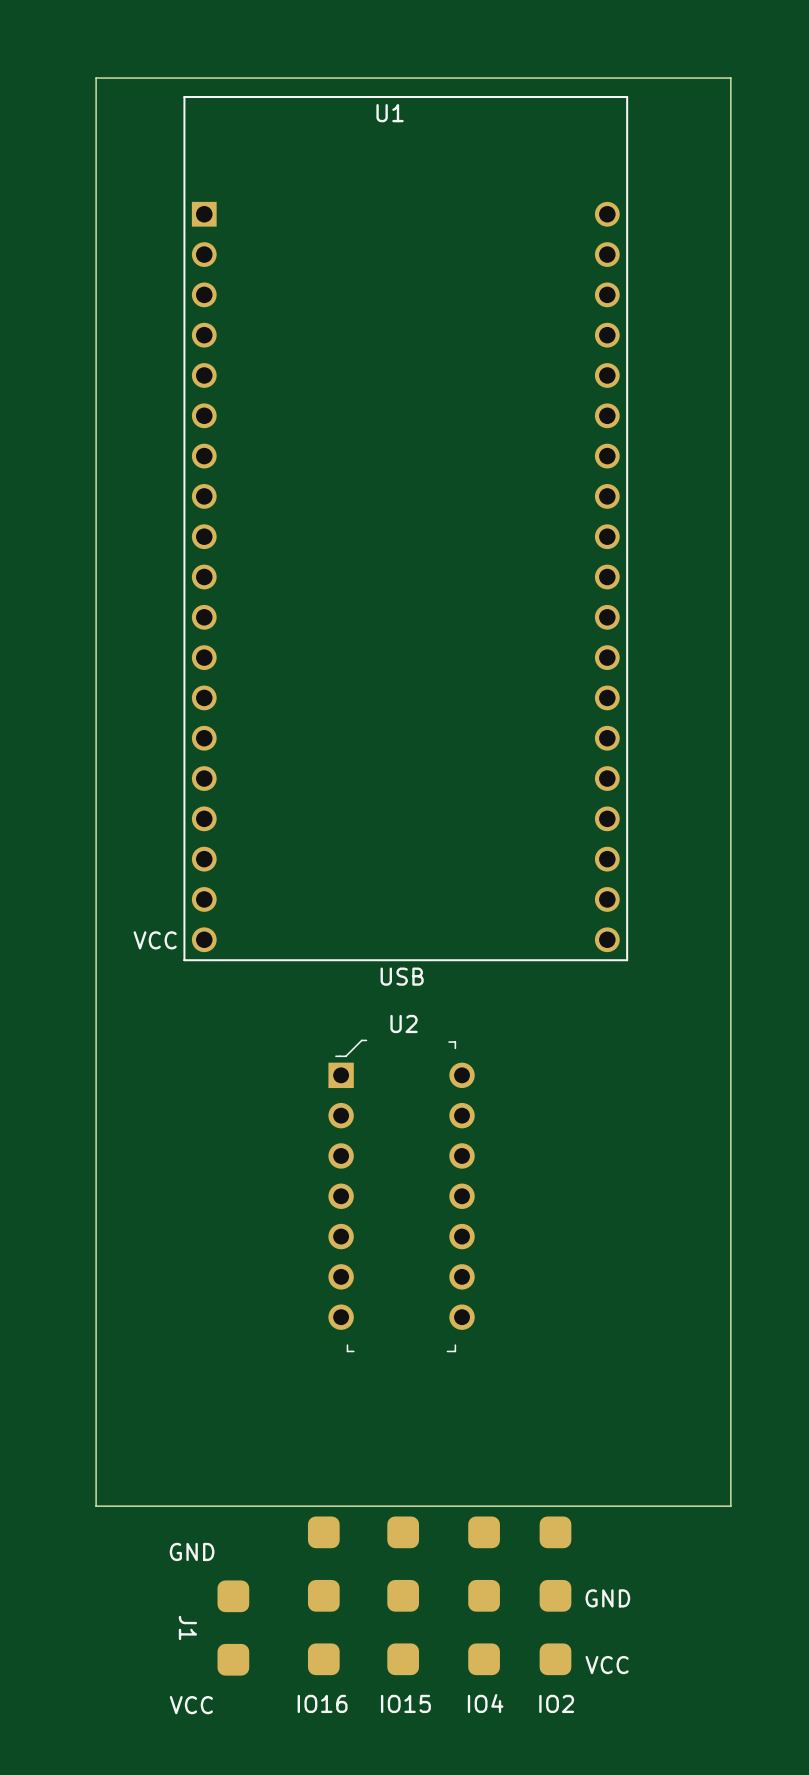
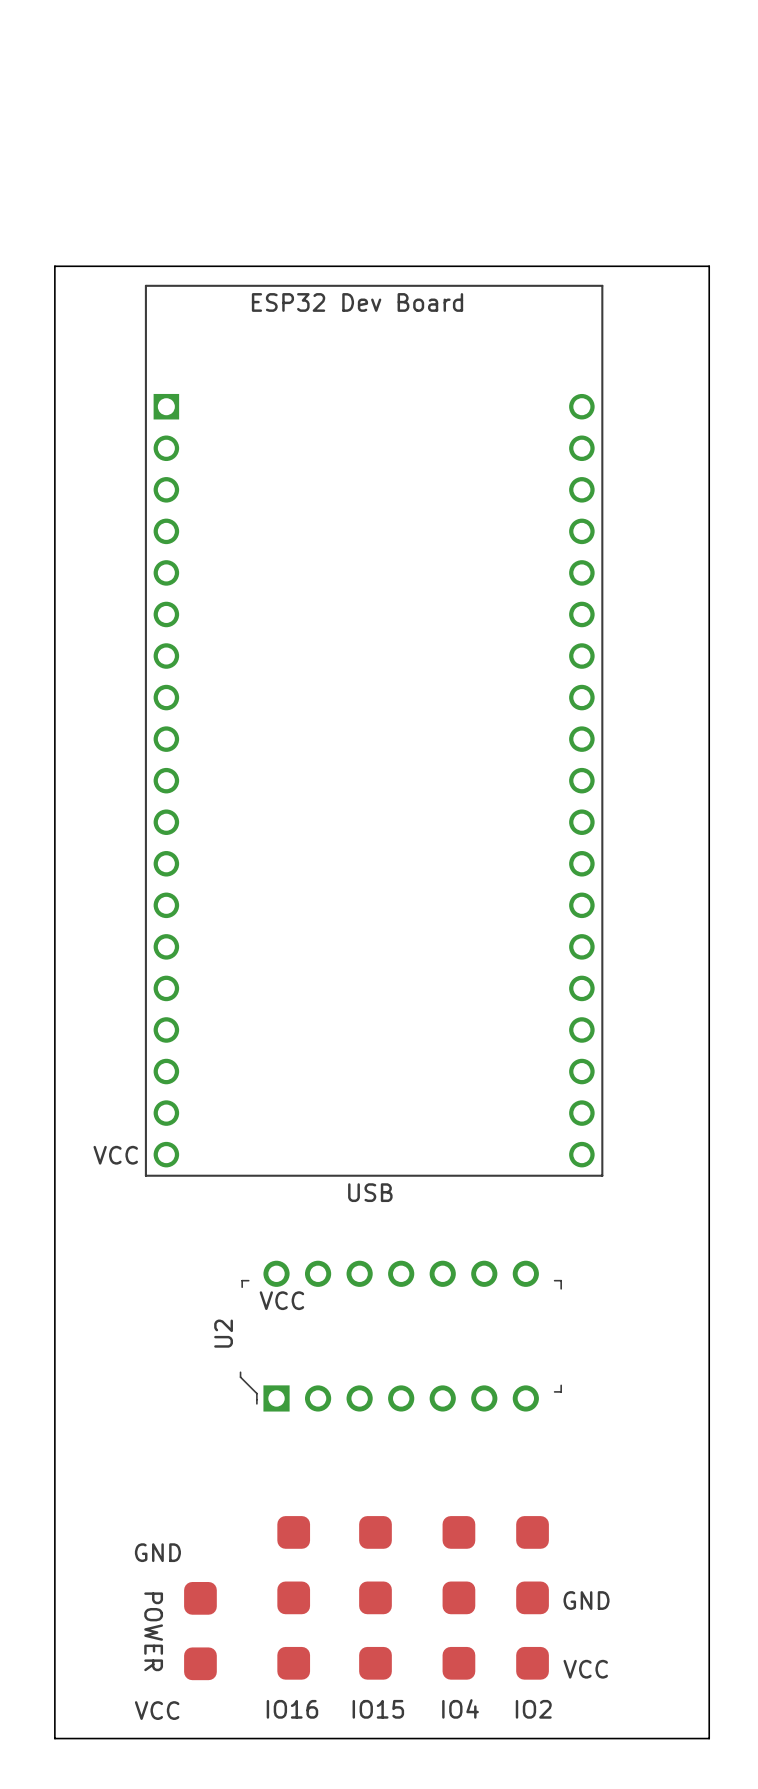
board edge: (96, 78) (730, 78) (730, 1506) (96, 1506) (96, 78) -> (54, 266) (54, 1738) (709, 1738) (709, 266) (54, 266)
U1: (405, 528) -> none
ESP32 Dev Board: none -> (374, 730)
text: VCC (155, 940) -> none
text position: USB (402, 976) -> USB (370, 1192)
text: none -> VCC (115, 1155)
U2 rotation: 0° (401, 1195) -> 90° counterclockwise (400, 1336)
text: none -> VCC (281, 1300)
J1 name: J1 (187, 1627) -> POWER (153, 1631)

